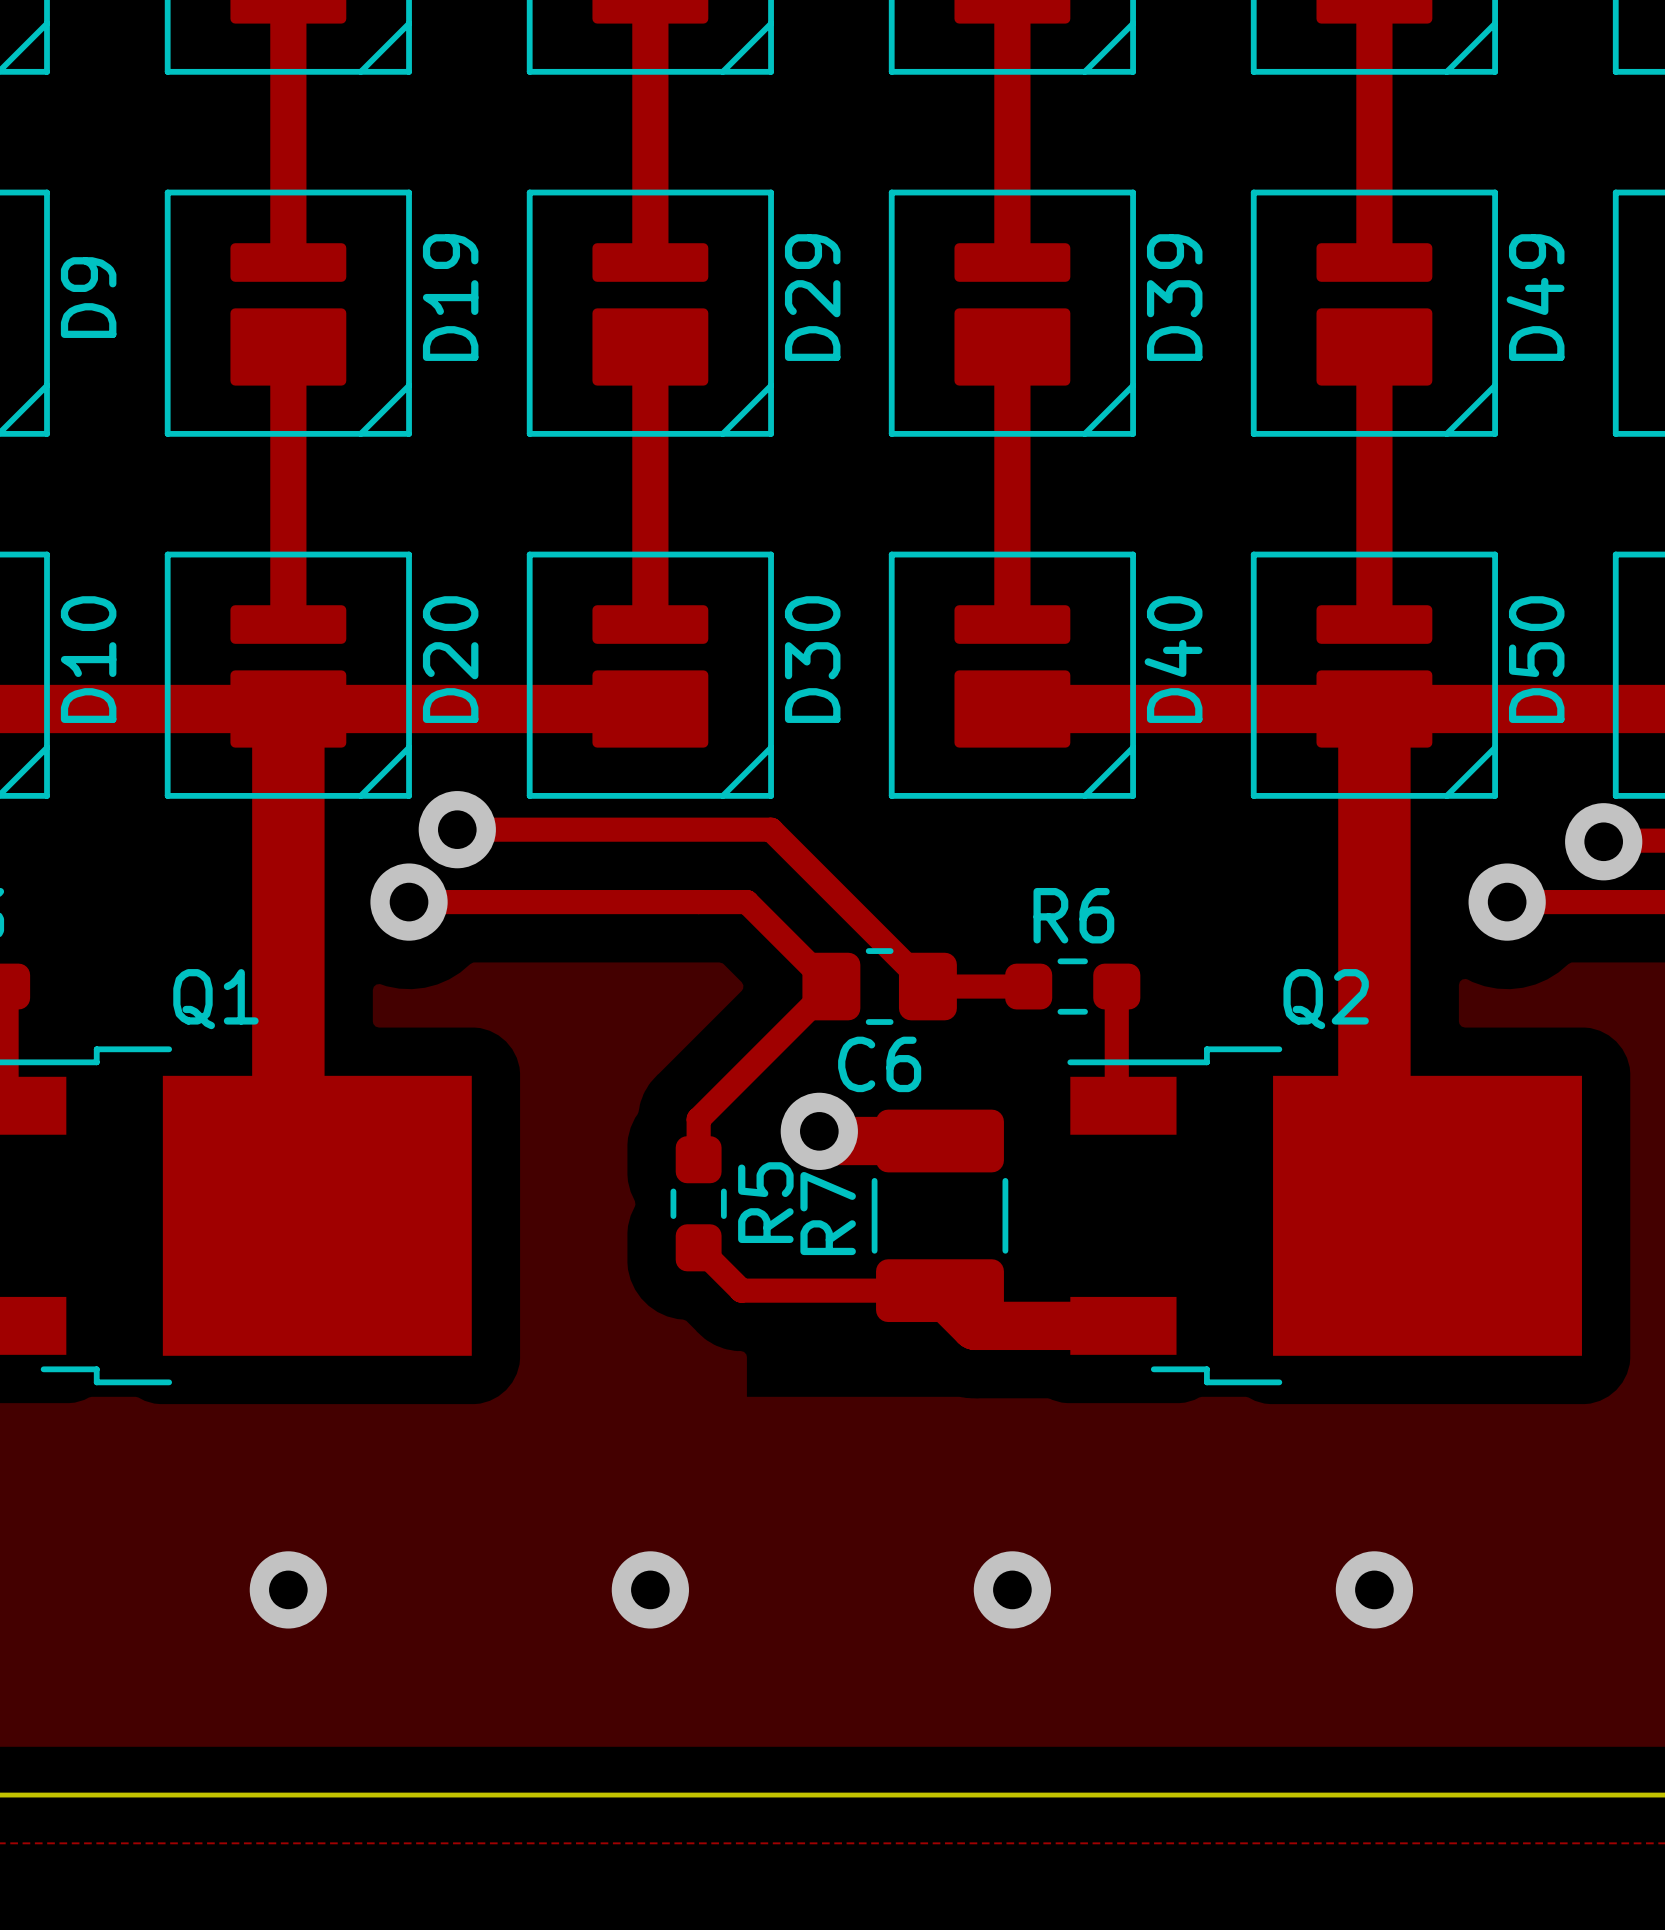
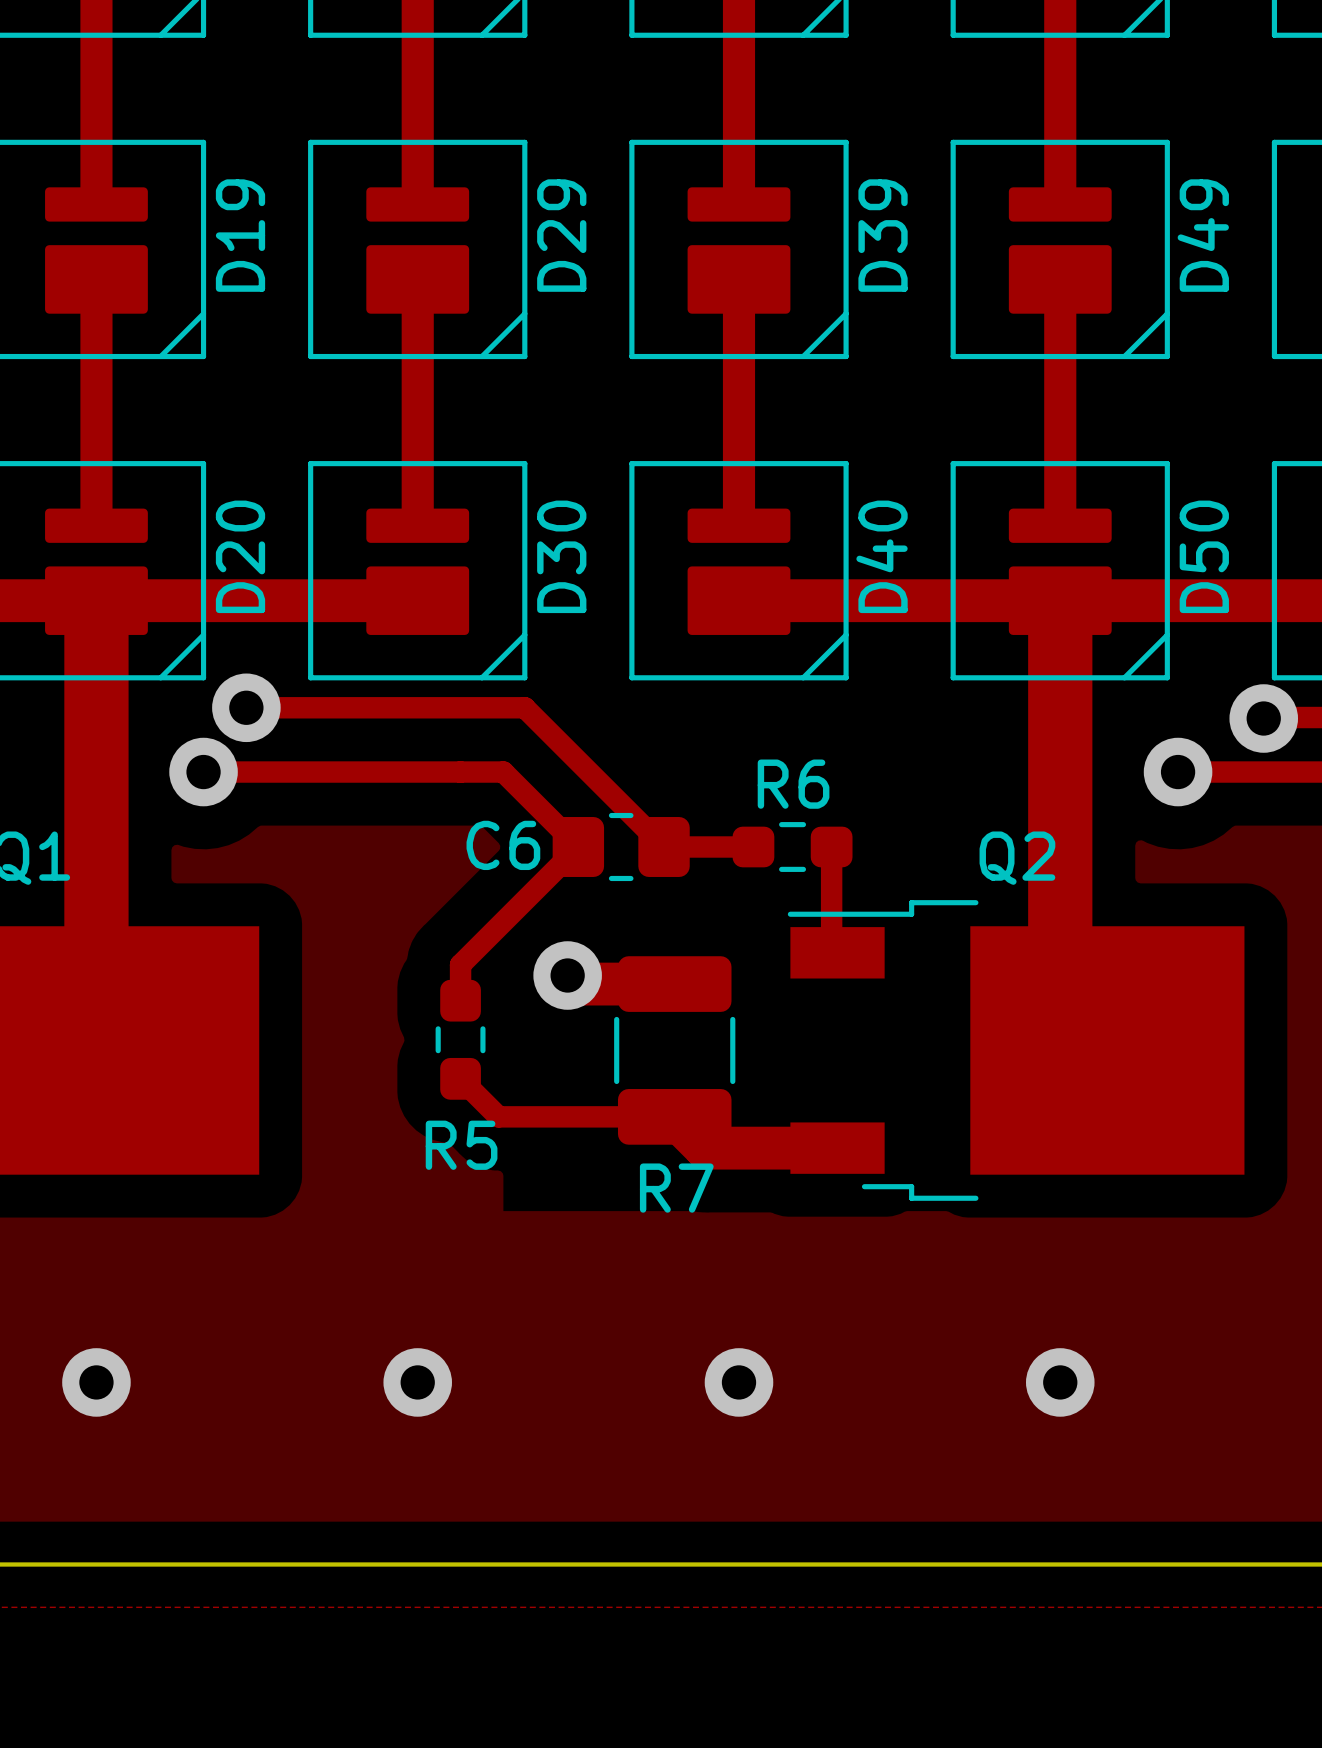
C6 name position: C6 (879, 1064) -> C6 (503, 845)
R5 name rotation: 0° (765, 1202) -> 90° clockwise (461, 1145)
R5 name position: R5 (765, 1202) -> R5 (461, 1145)
R7 name rotation: 0° (828, 1213) -> 90° clockwise (676, 1188)
R7 name position: R7 (828, 1213) -> R7 (676, 1188)

